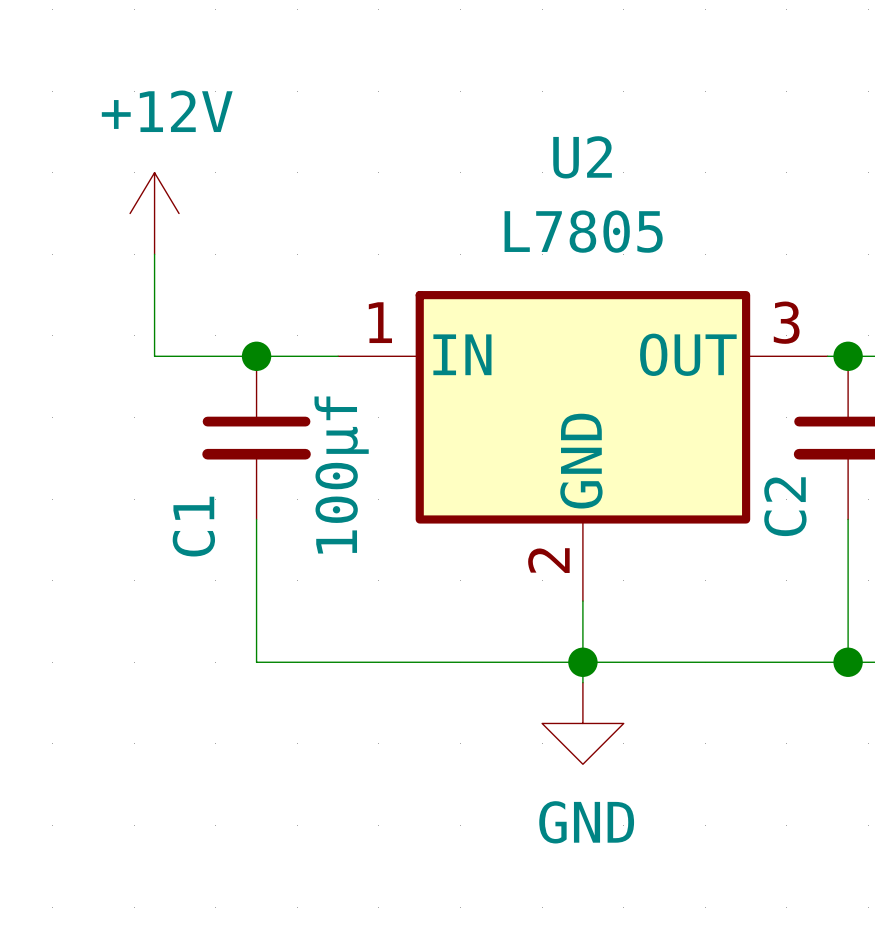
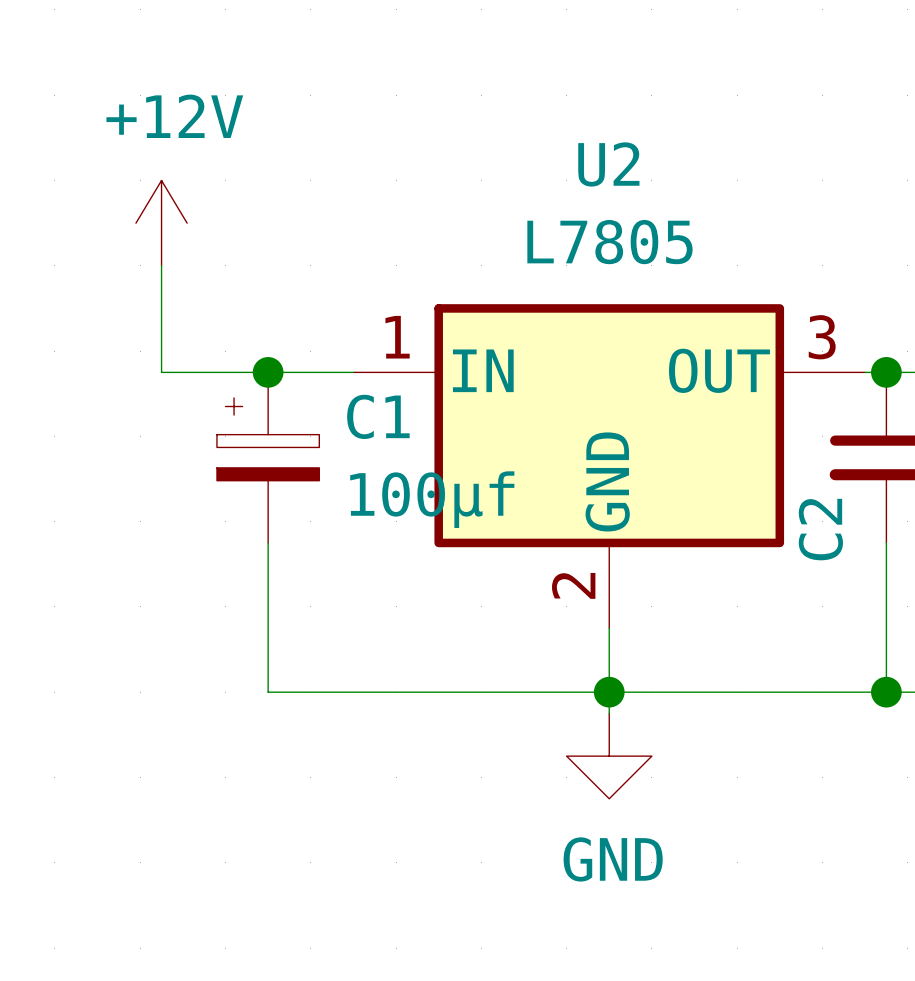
C1 symbol: [202, 356, 311, 520] -> [216, 372, 320, 543]
C1 value position: 100µf (341, 475) -> 100µf (432, 499)
C1 name position: C1 (193, 526) -> C1 (378, 416)

